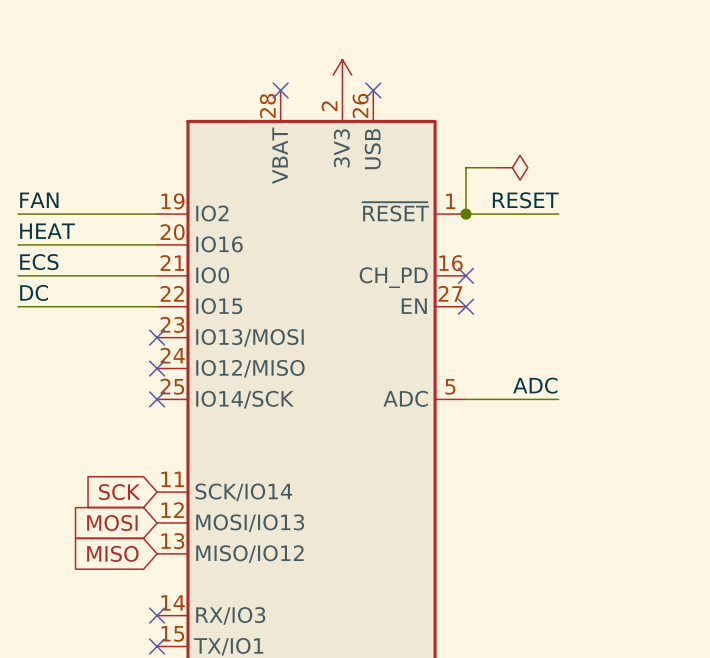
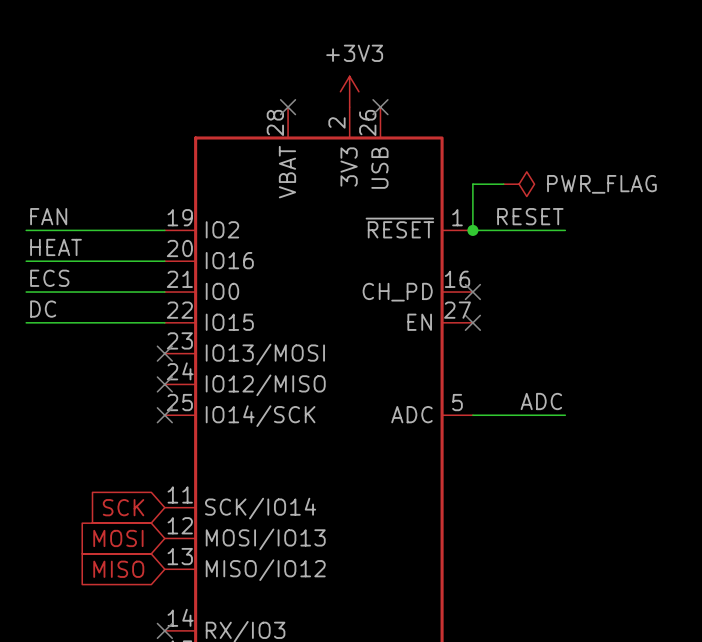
power symbol text: none -> +3V3 (354, 53)
power symbol text: none -> PWR_FLAG (601, 184)

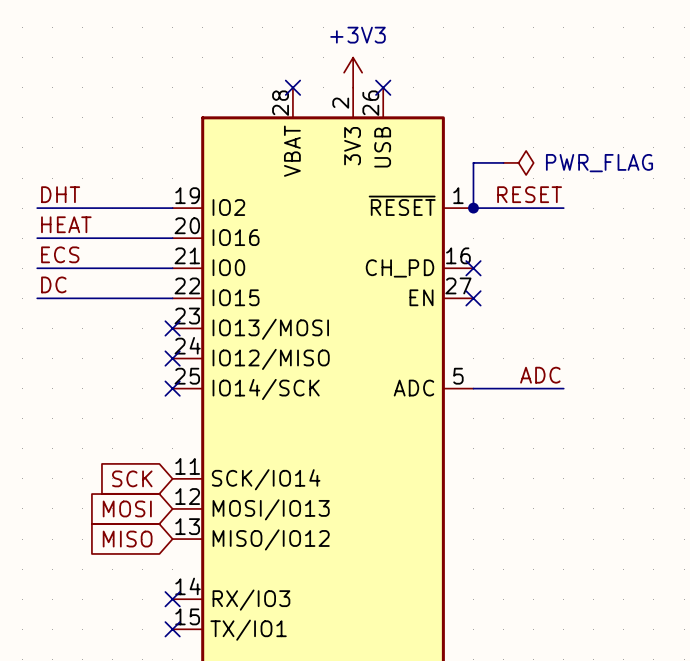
label: FAN (48, 216) -> DHT (60, 194)

